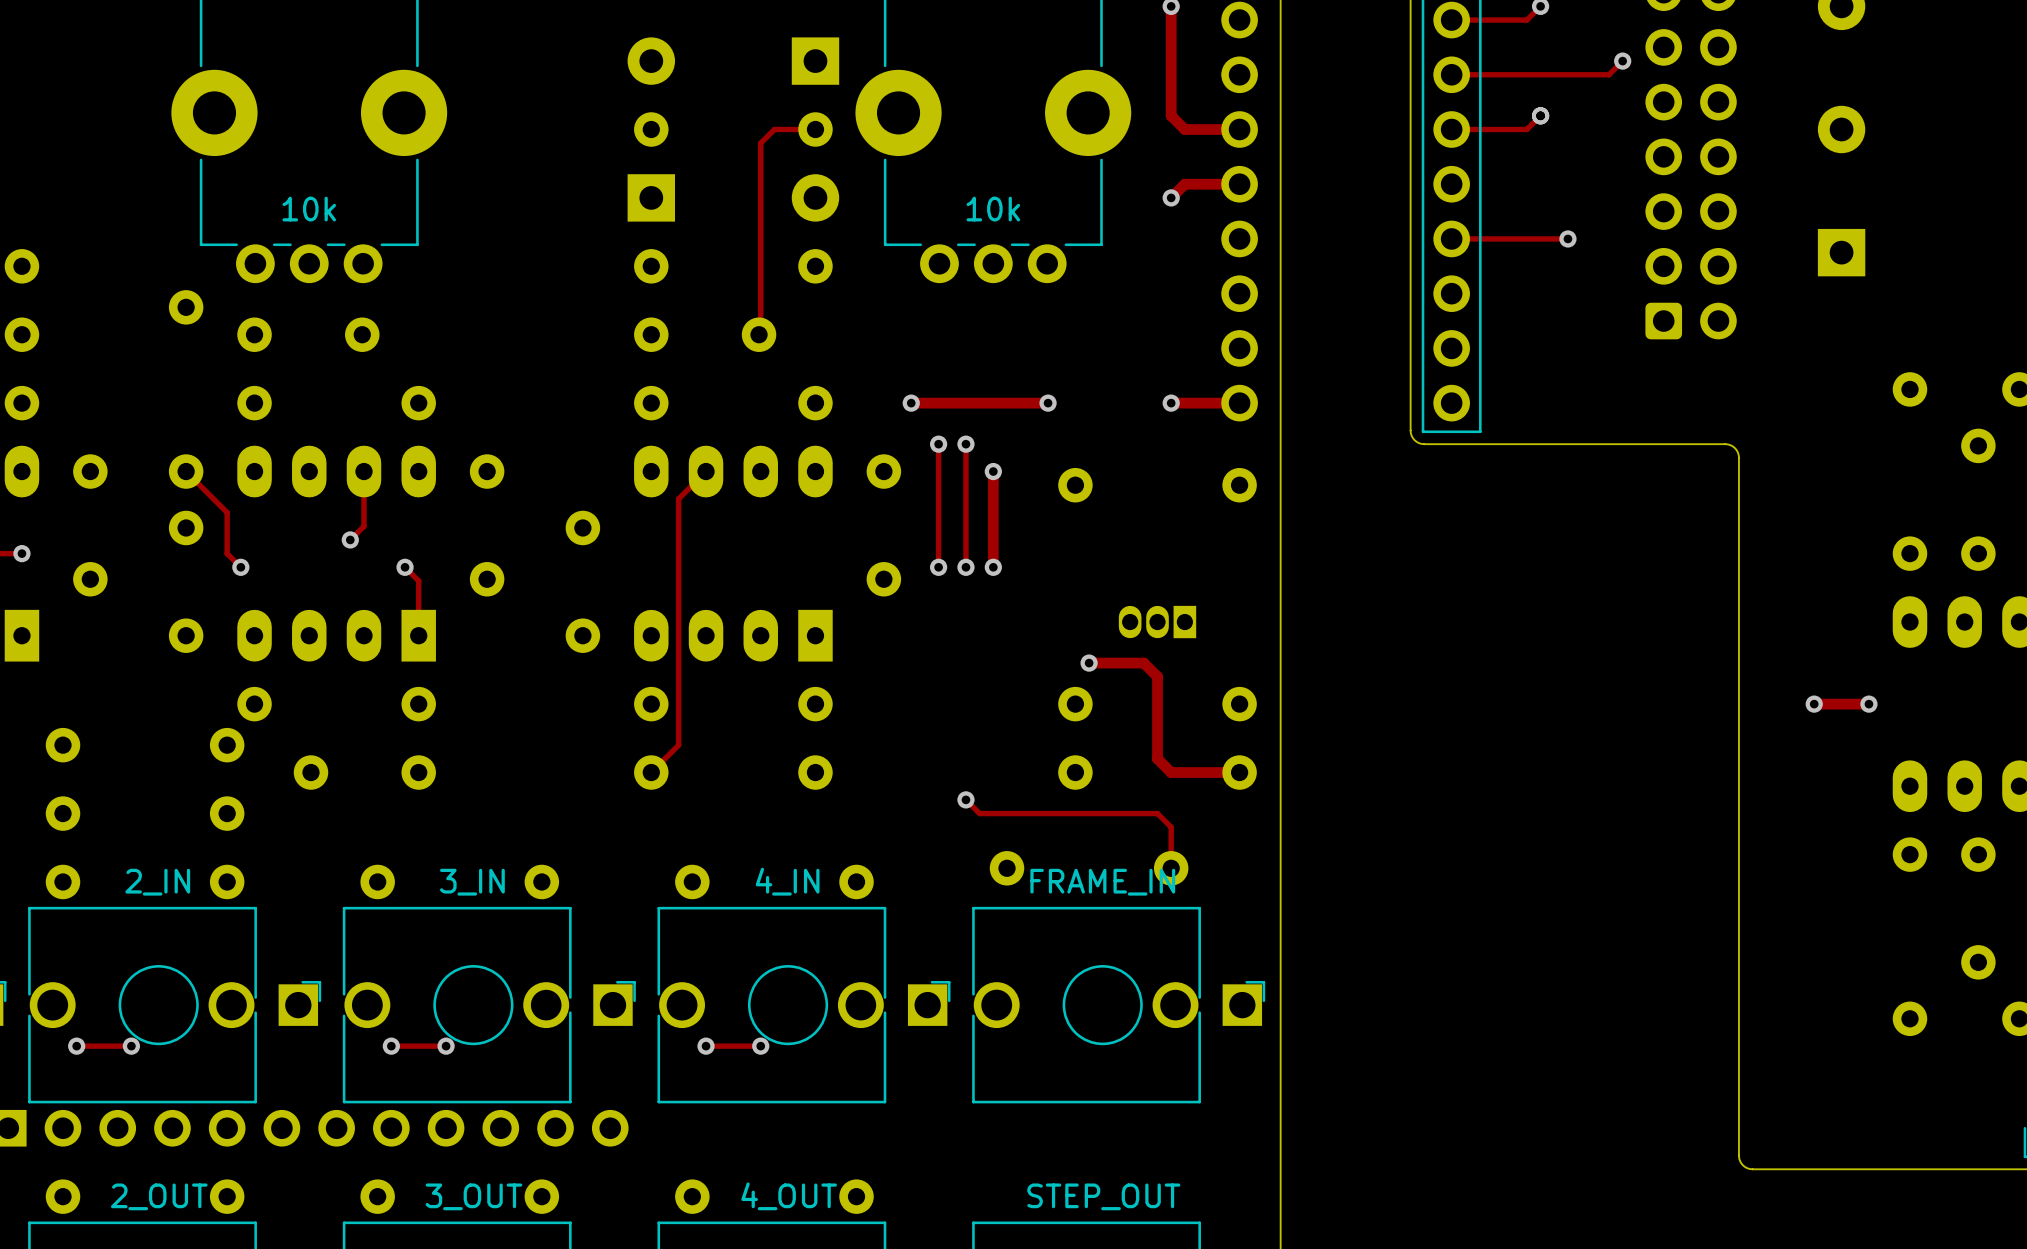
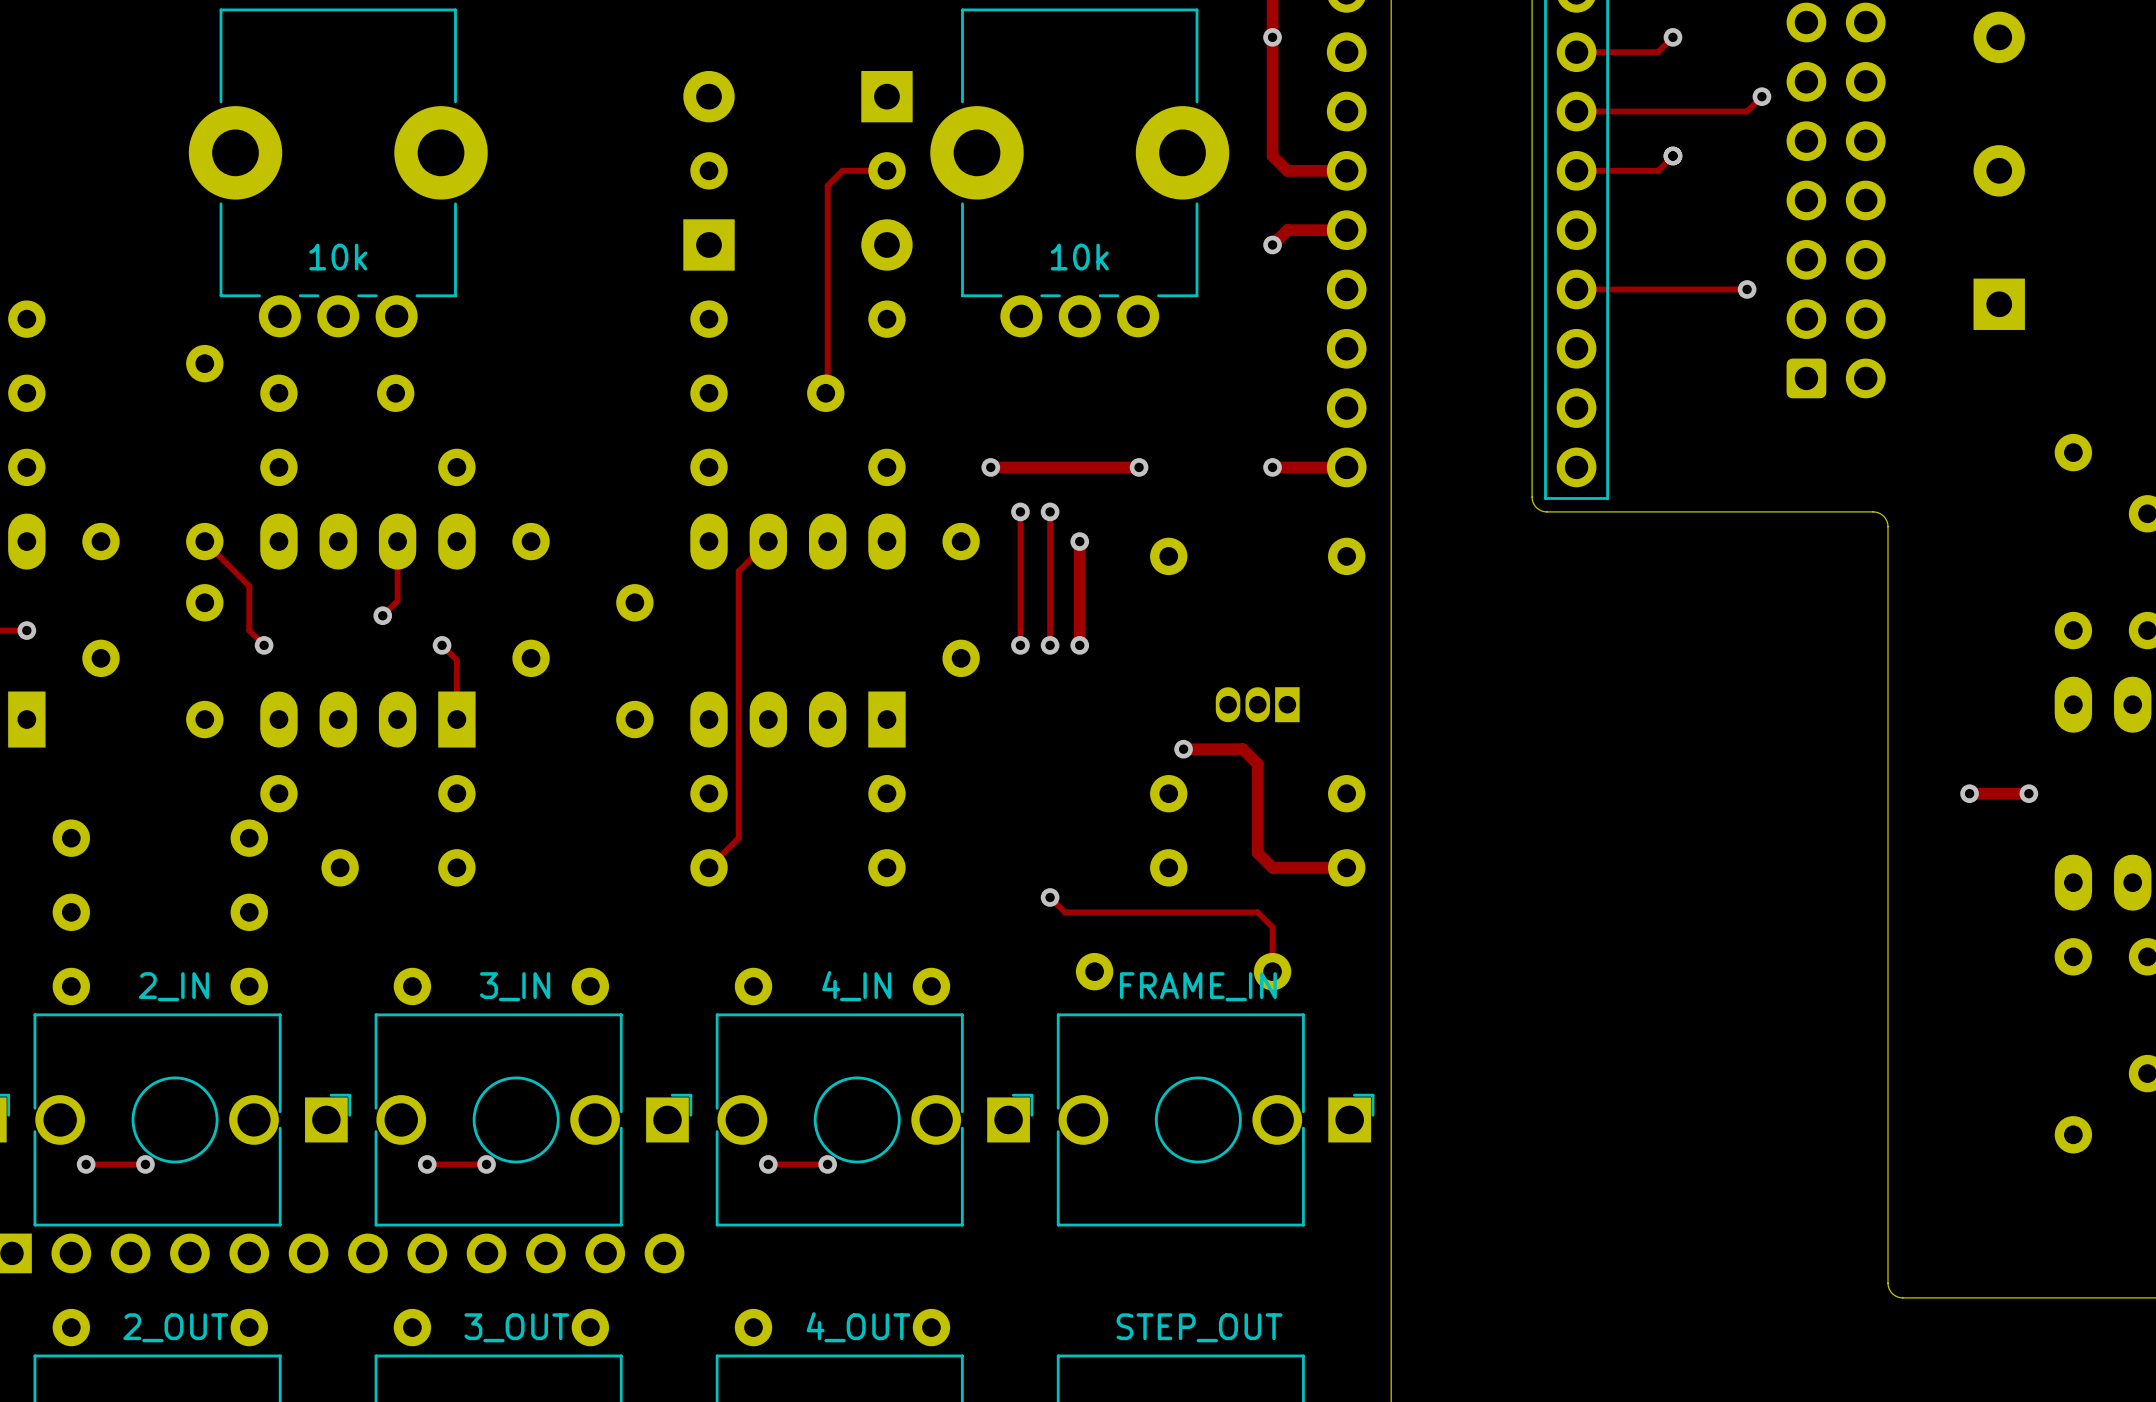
track: none -> (1702, 289) (1747, 289)
via position: (1567, 238) -> (1747, 289)

